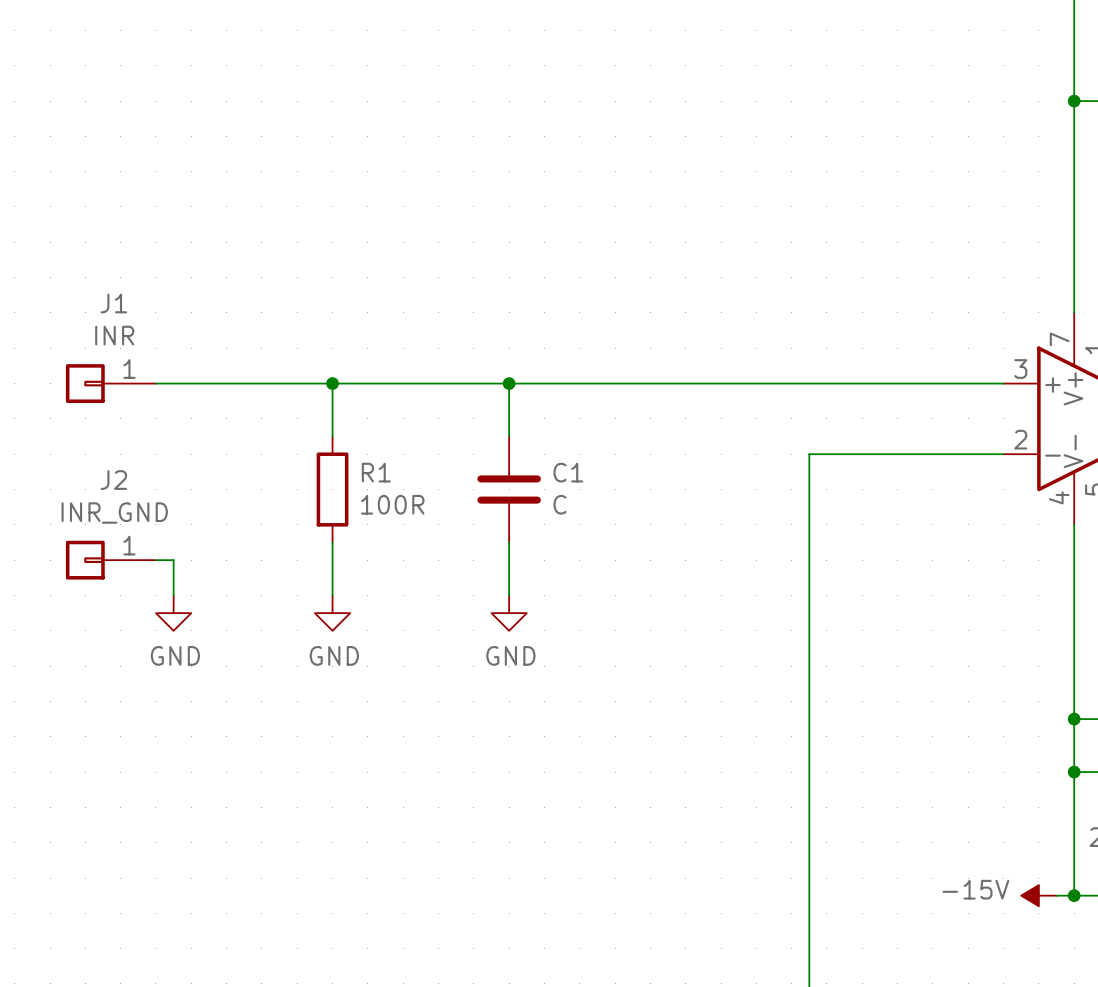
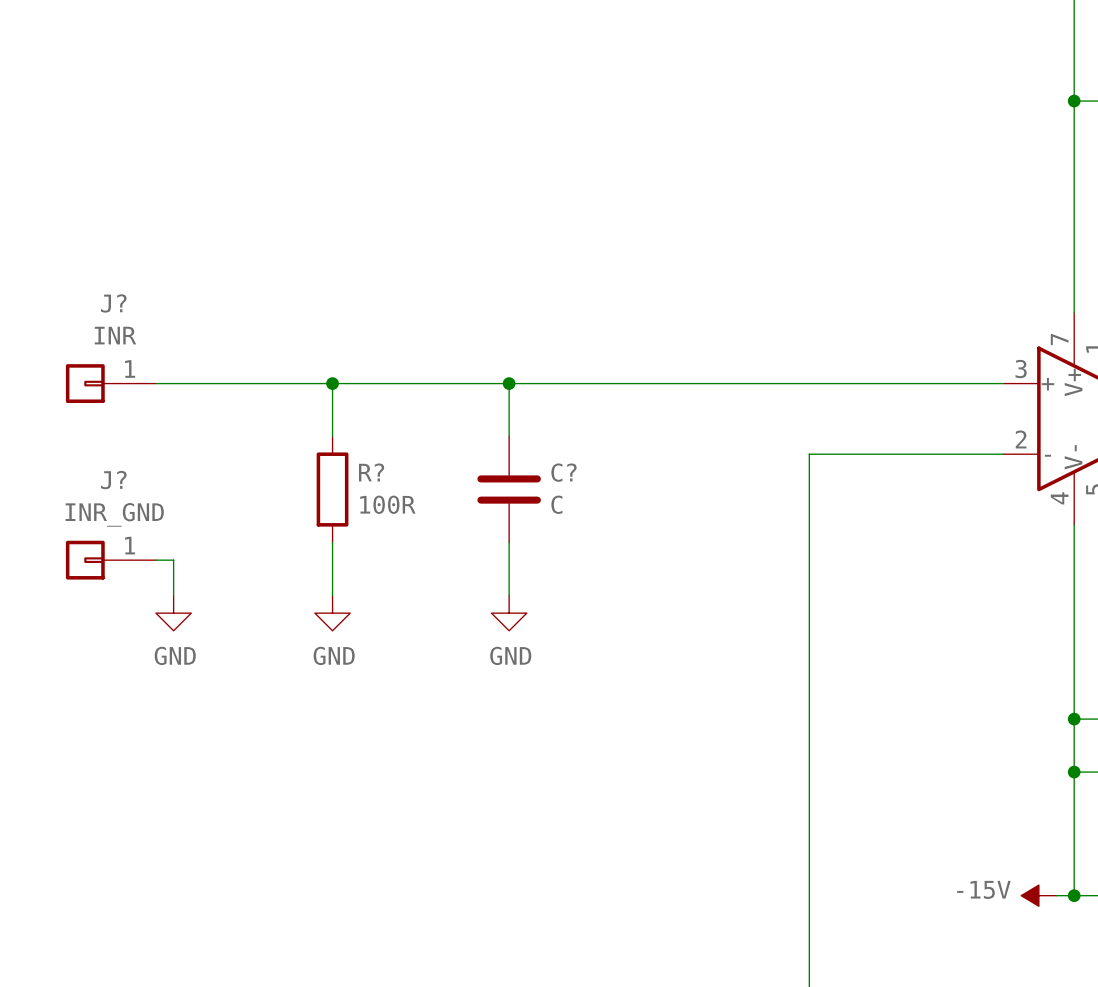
J1 name: J1 (113, 303) -> J? (113, 303)
R1 name: R1 (376, 472) -> R? (371, 472)
C1 name: C1 (568, 472) -> C? (564, 472)
J2 name: J2 (113, 480) -> J? (113, 480)

